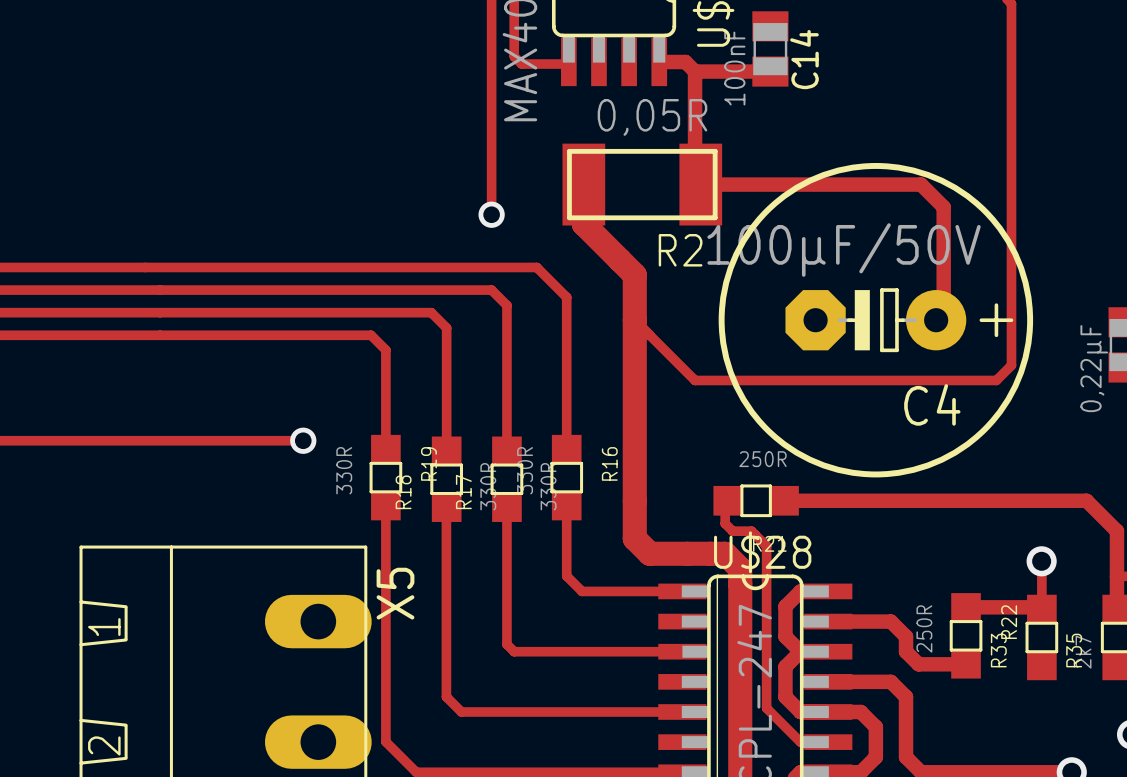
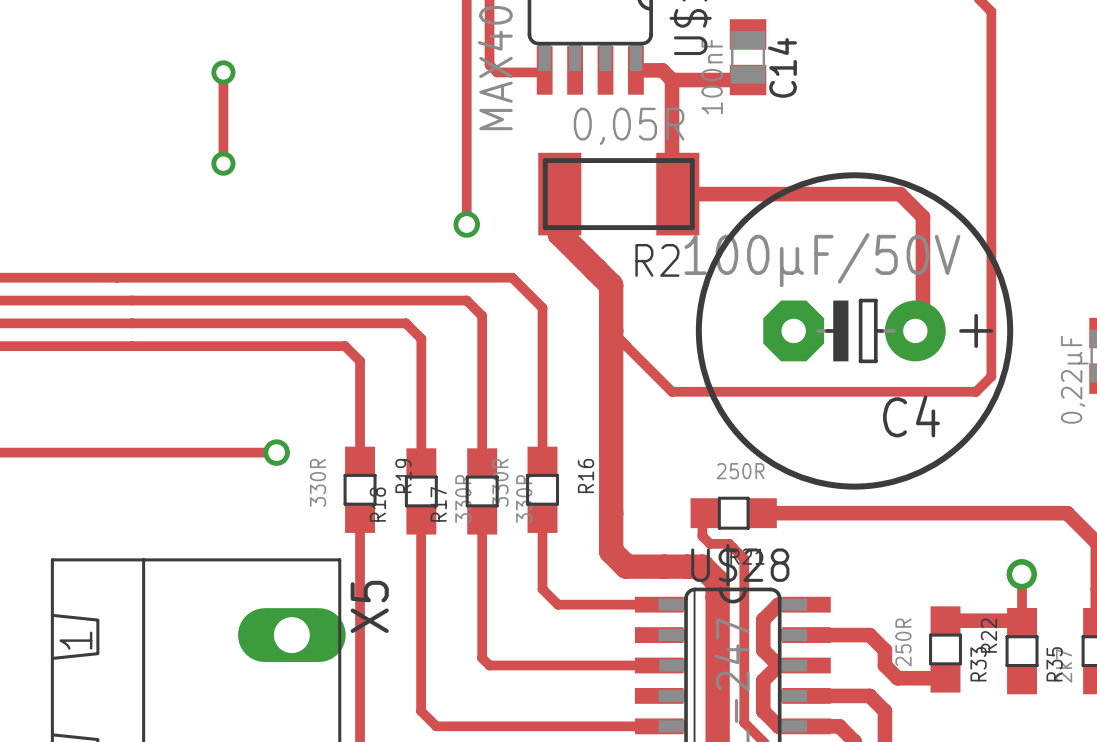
track: none -> (223, 72) (223, 163)
via: none -> (223, 72)
via: none -> (223, 163)

